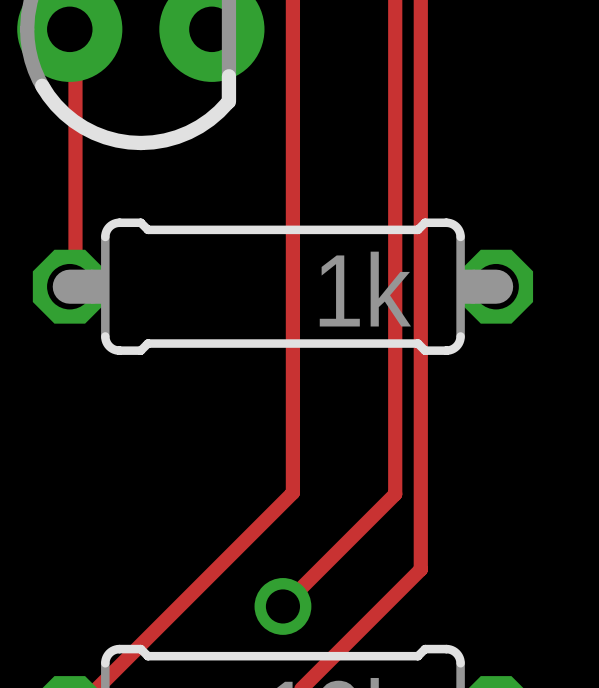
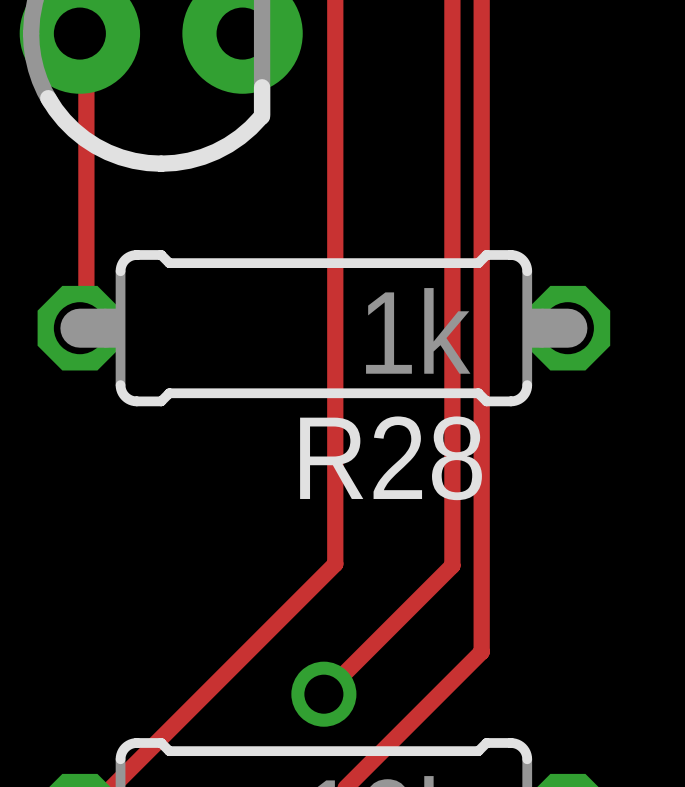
R28 name: none -> R28 (391, 458)

